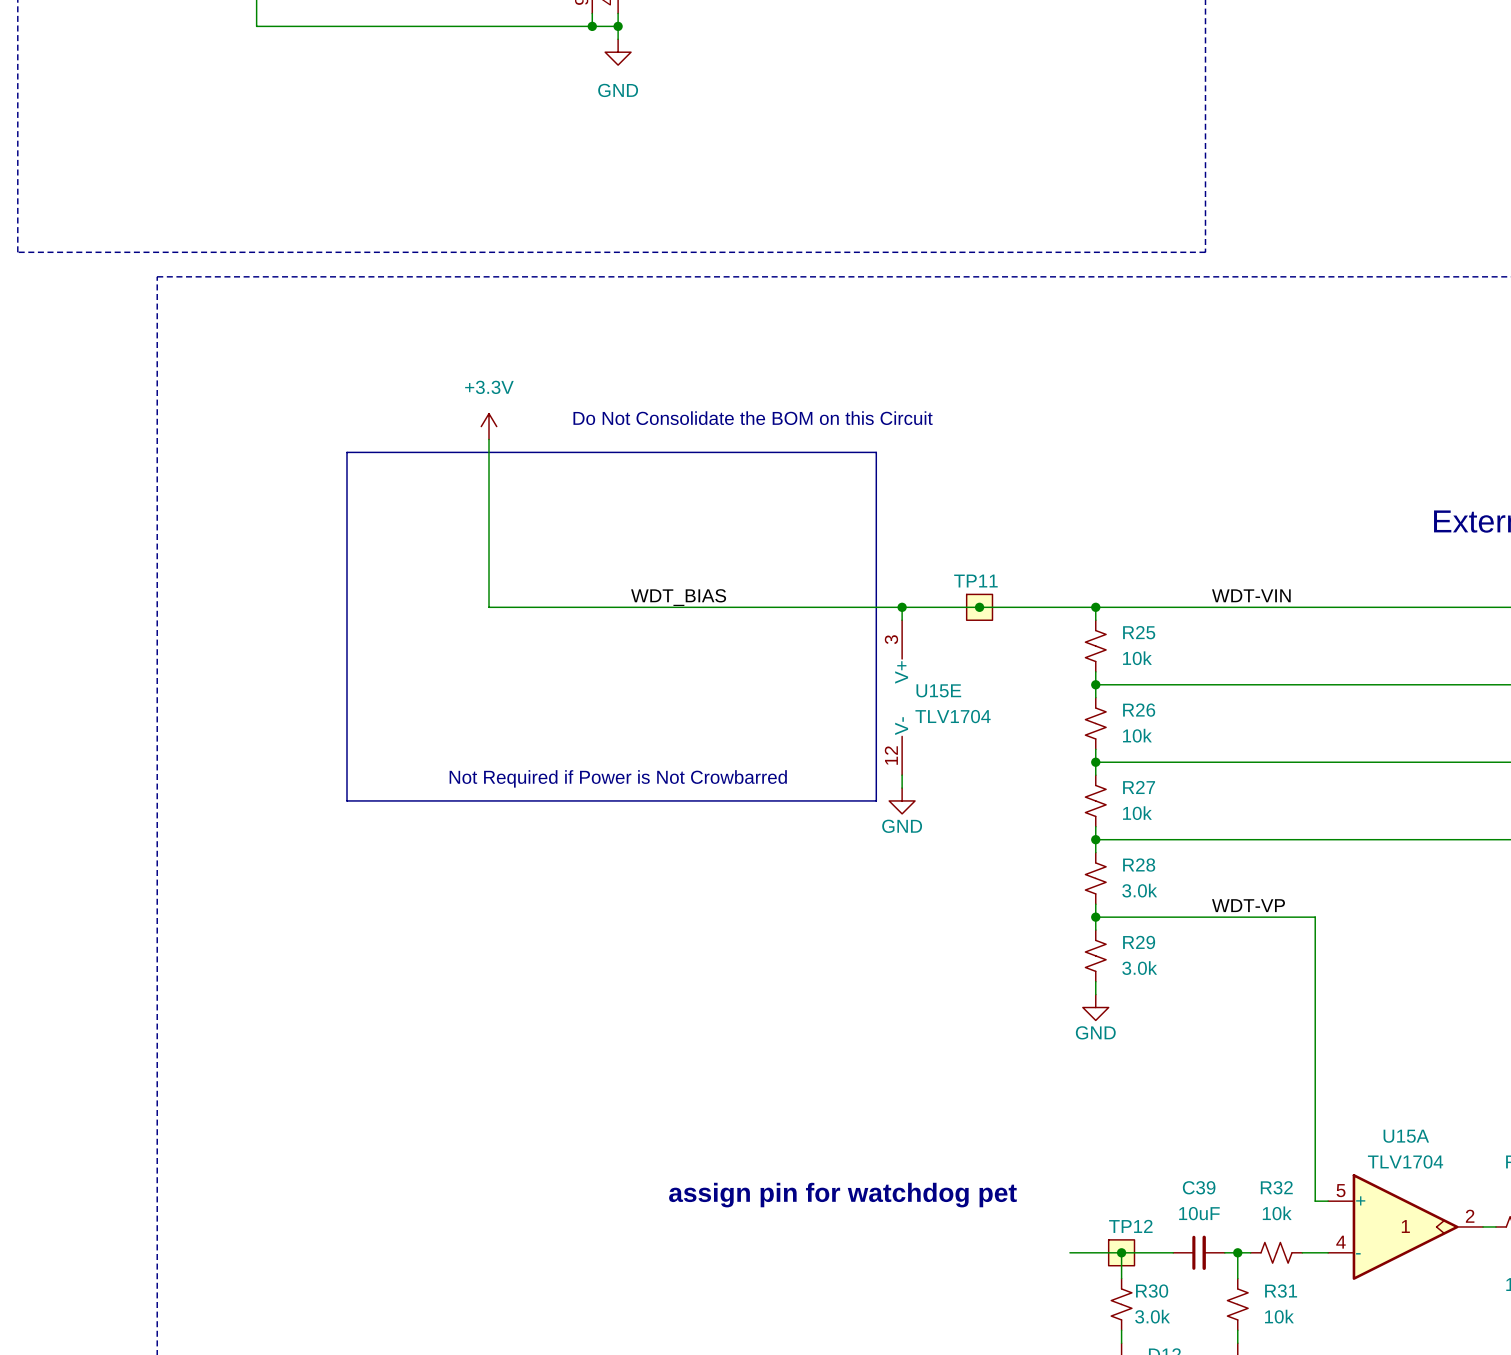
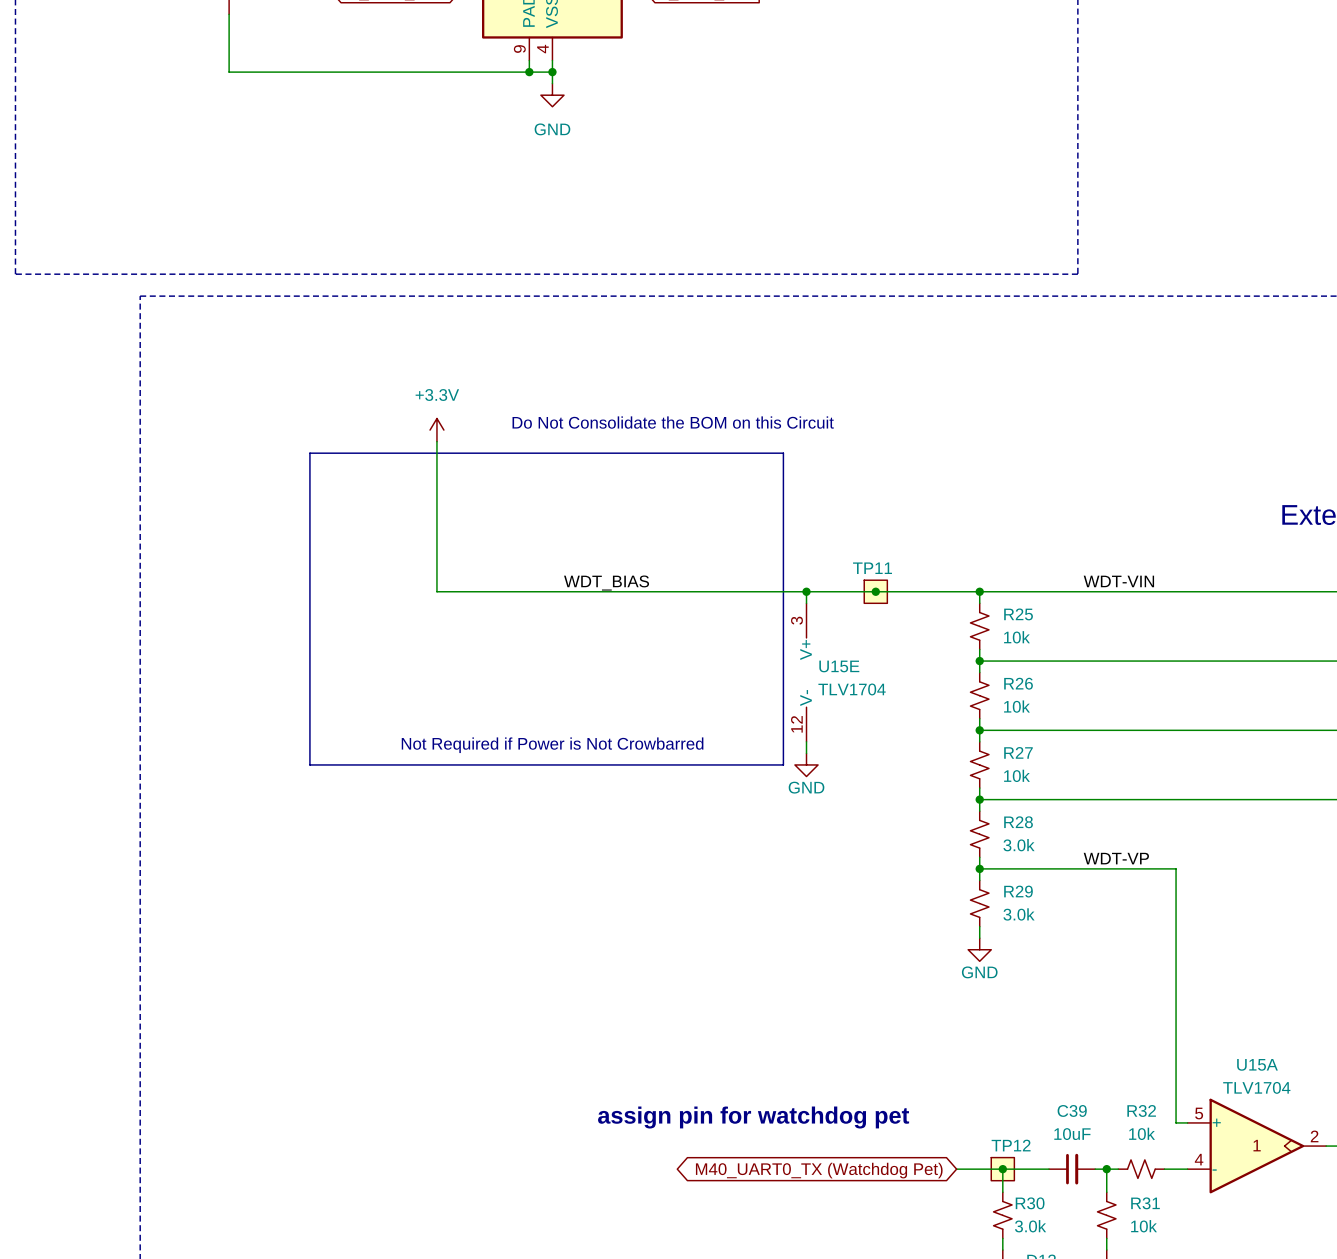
global label: none -> M40_UART0_TX (Watchdog Pet) (819, 1170)

